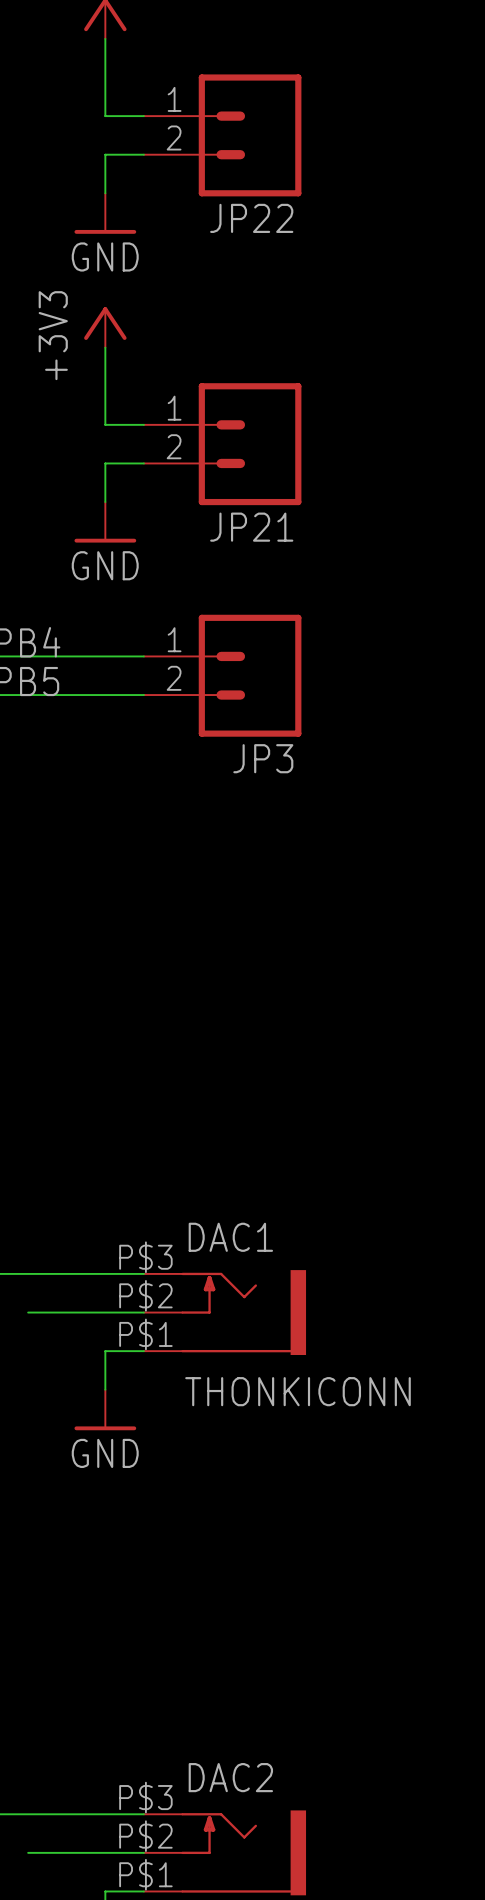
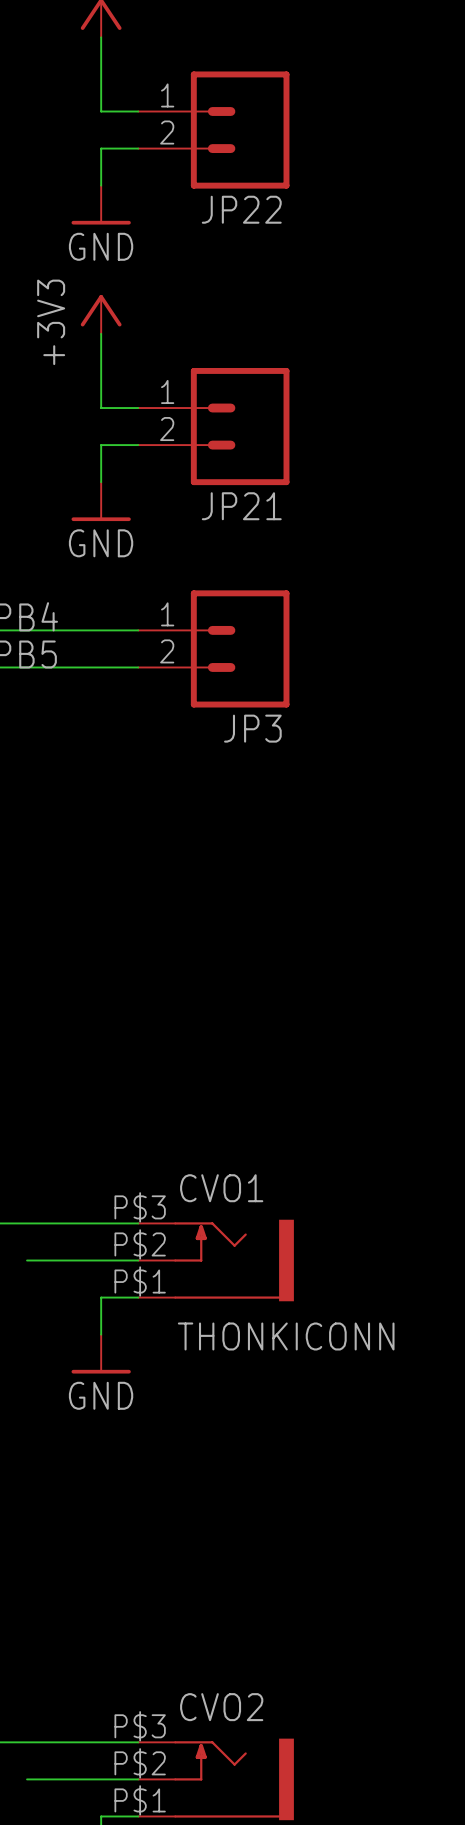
DAC1 name: DAC1 (230, 1237) -> CVO1 (221, 1188)
DAC2 name: DAC2 (230, 1777) -> CVO2 (221, 1707)

